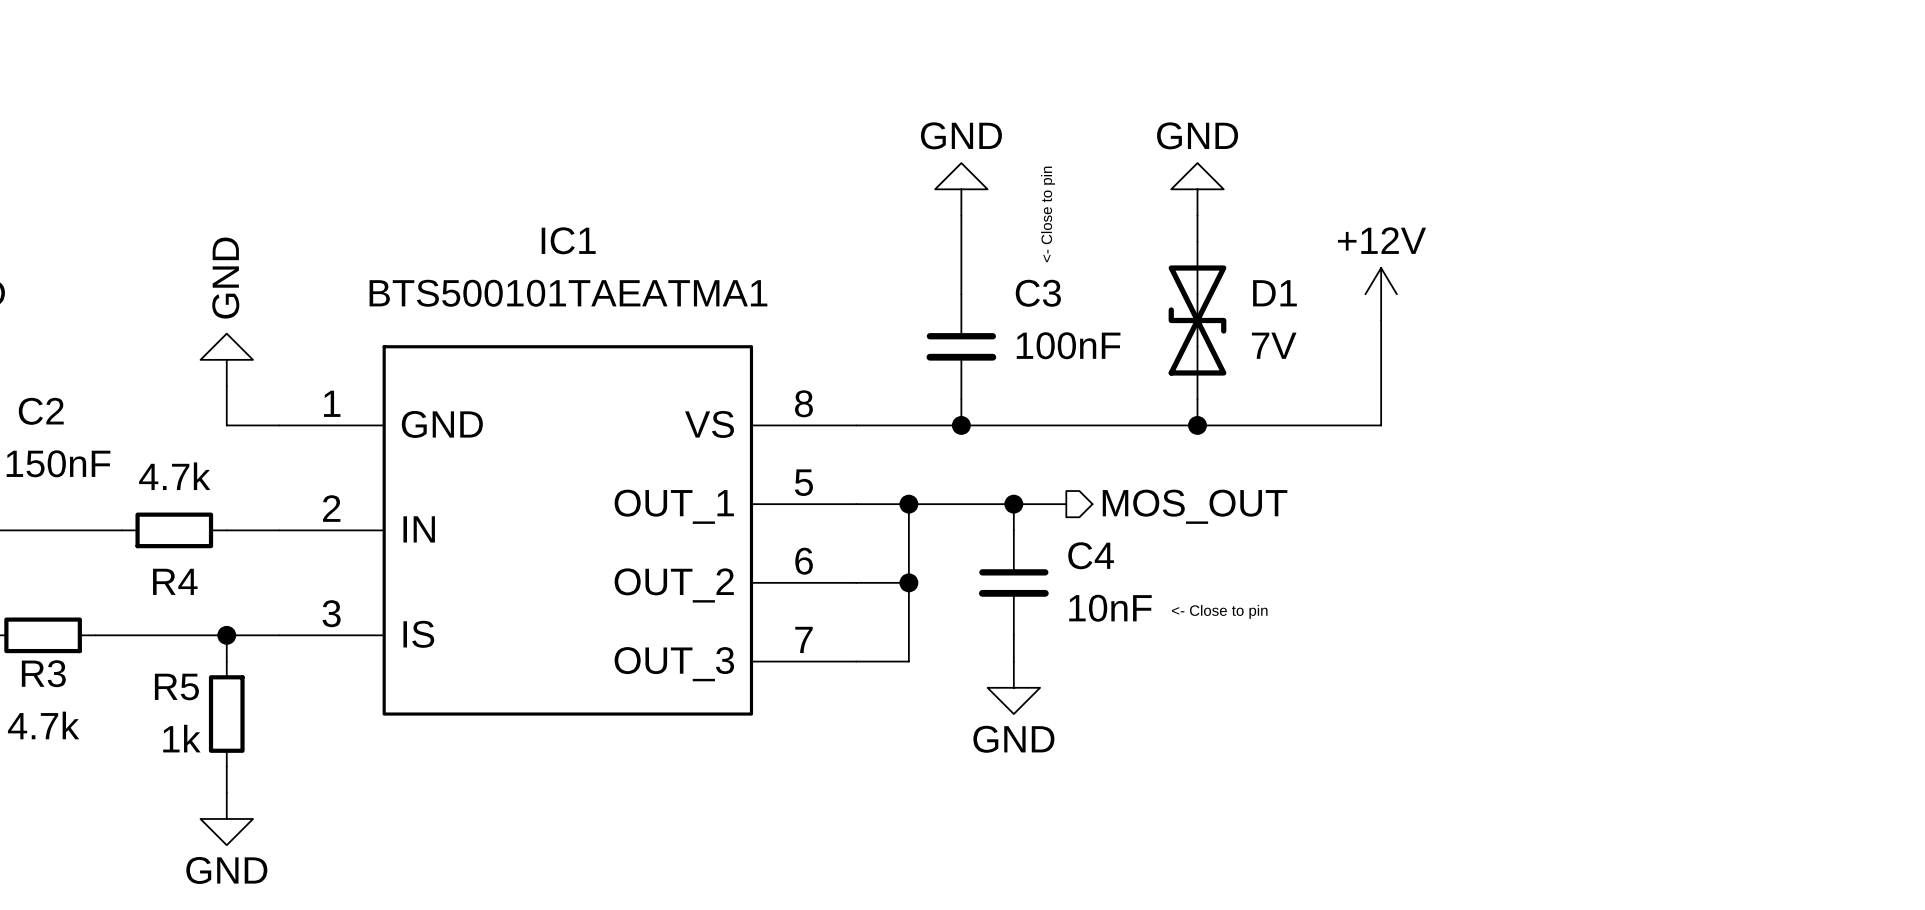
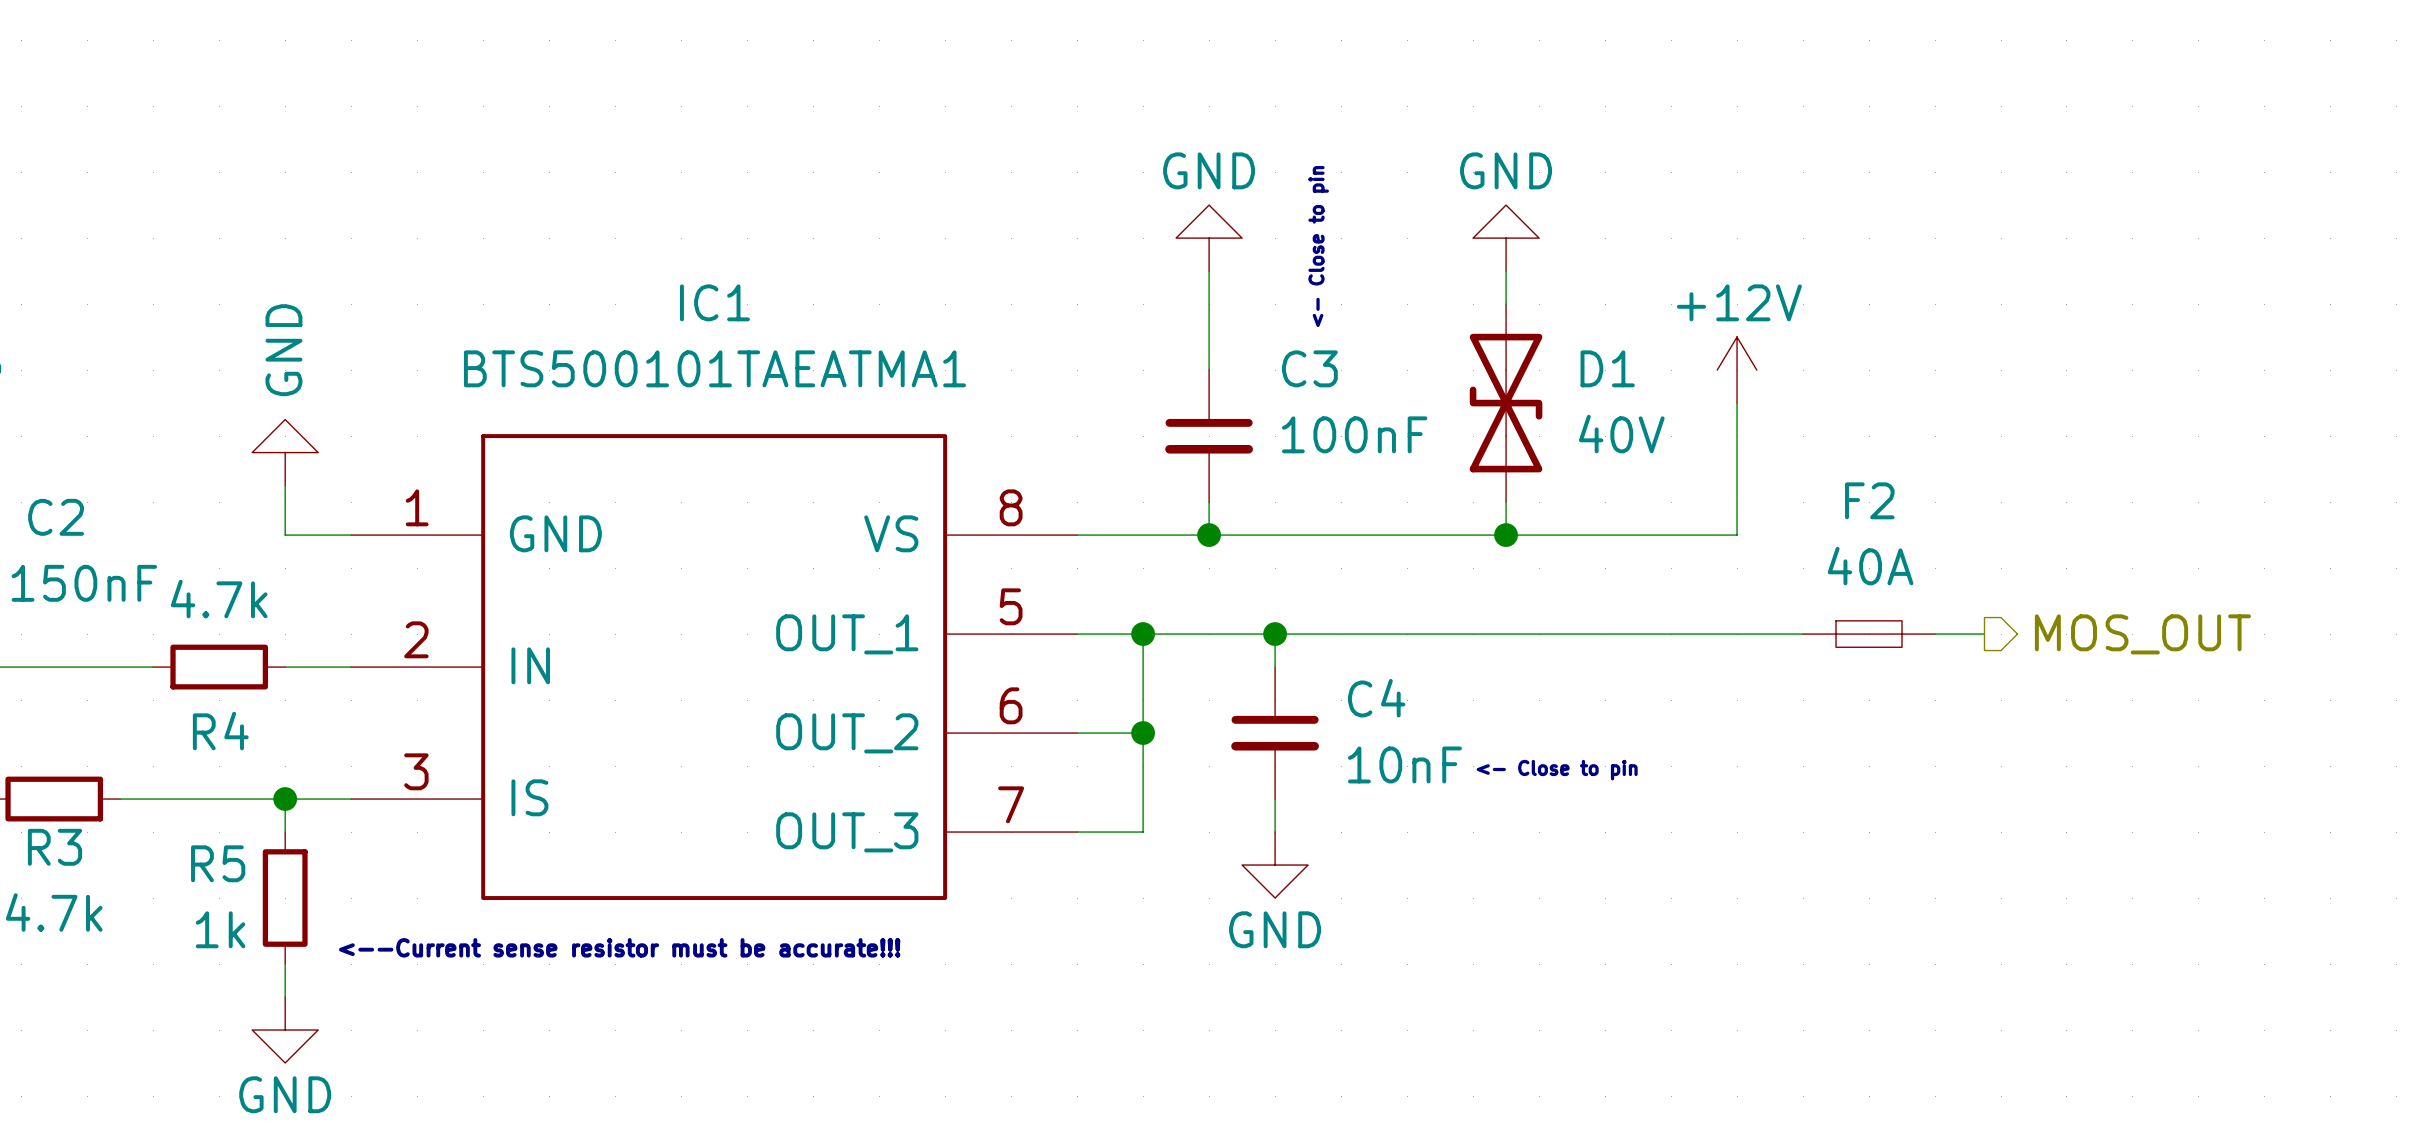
D1 value: 7V (1274, 345) -> 40V (1621, 434)
wire: none -> (1341, 634) (1803, 634)
F2: none -> 40A (1869, 634)
wire: none -> (1935, 634) (1984, 634)
hierarchical label position: MOS_OUT (1195, 506) -> MOS_OUT (2142, 634)
text: none -> <--Current sense resistor must be accurate!!! (619, 947)

